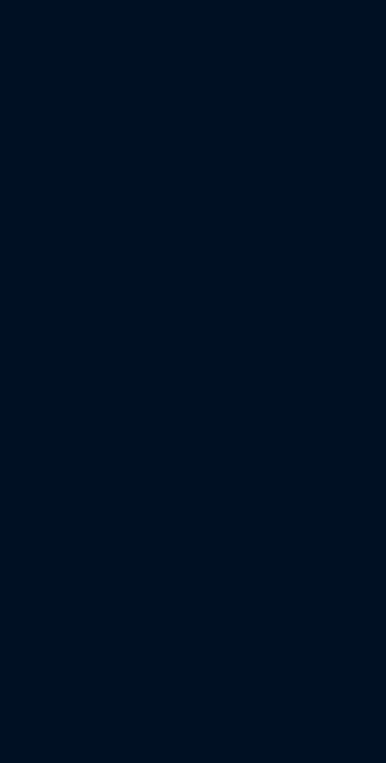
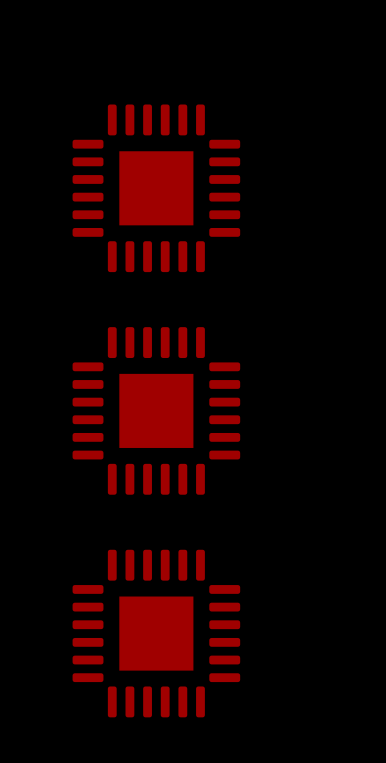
part: none -> (156, 188)
part: none -> (156, 410)
part: none -> (156, 633)

